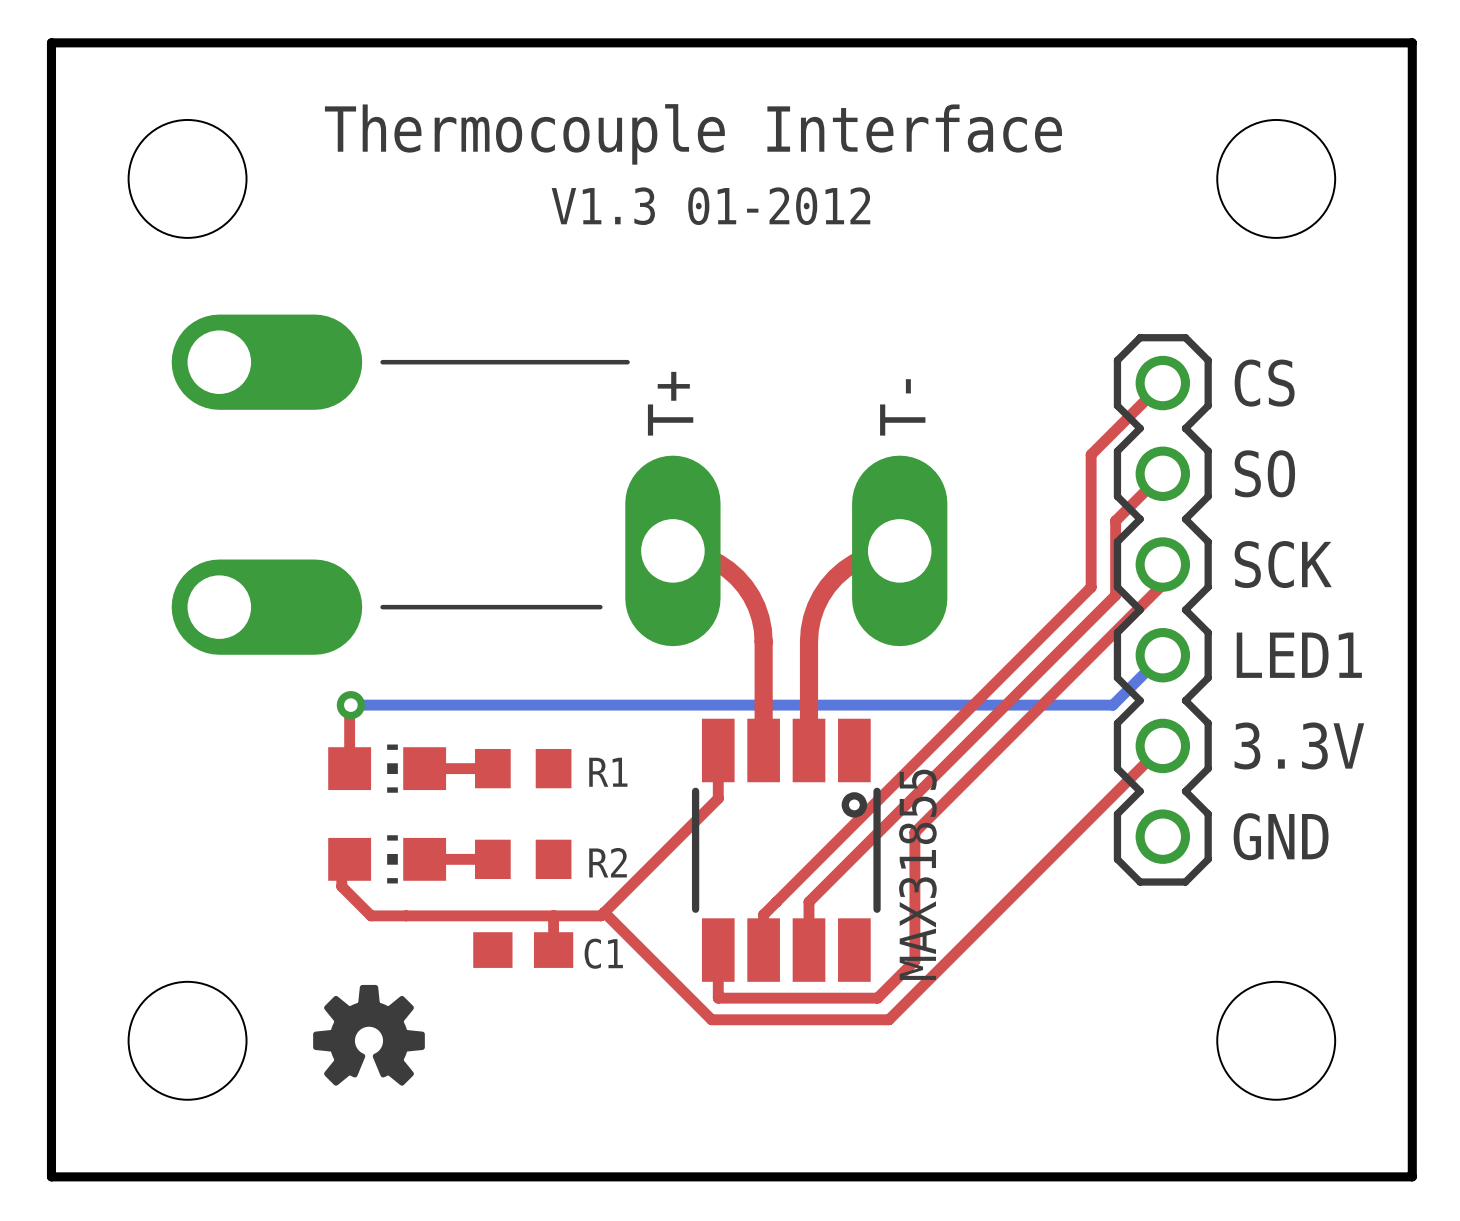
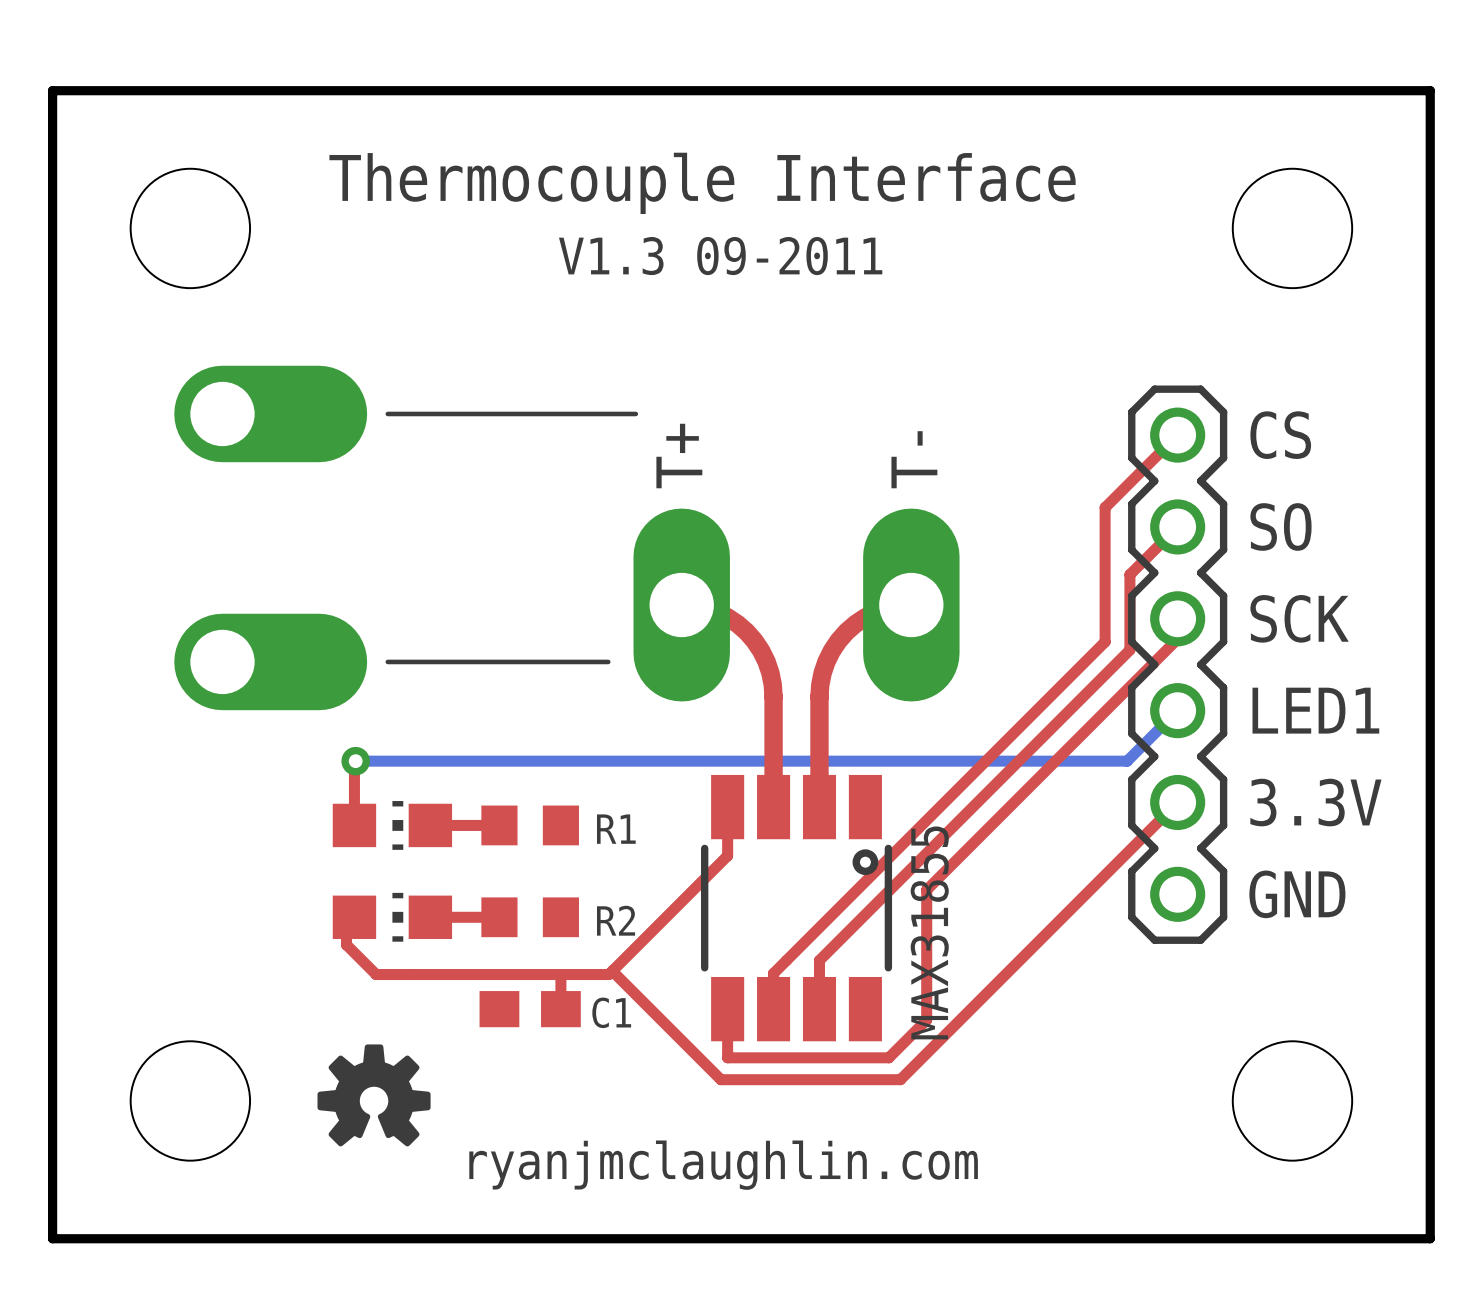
text: V1.3 01-2012 (710, 206) -> V1.3 09-2011 (720, 256)
text: none -> ryanjmclaughlin.com (723, 1165)

